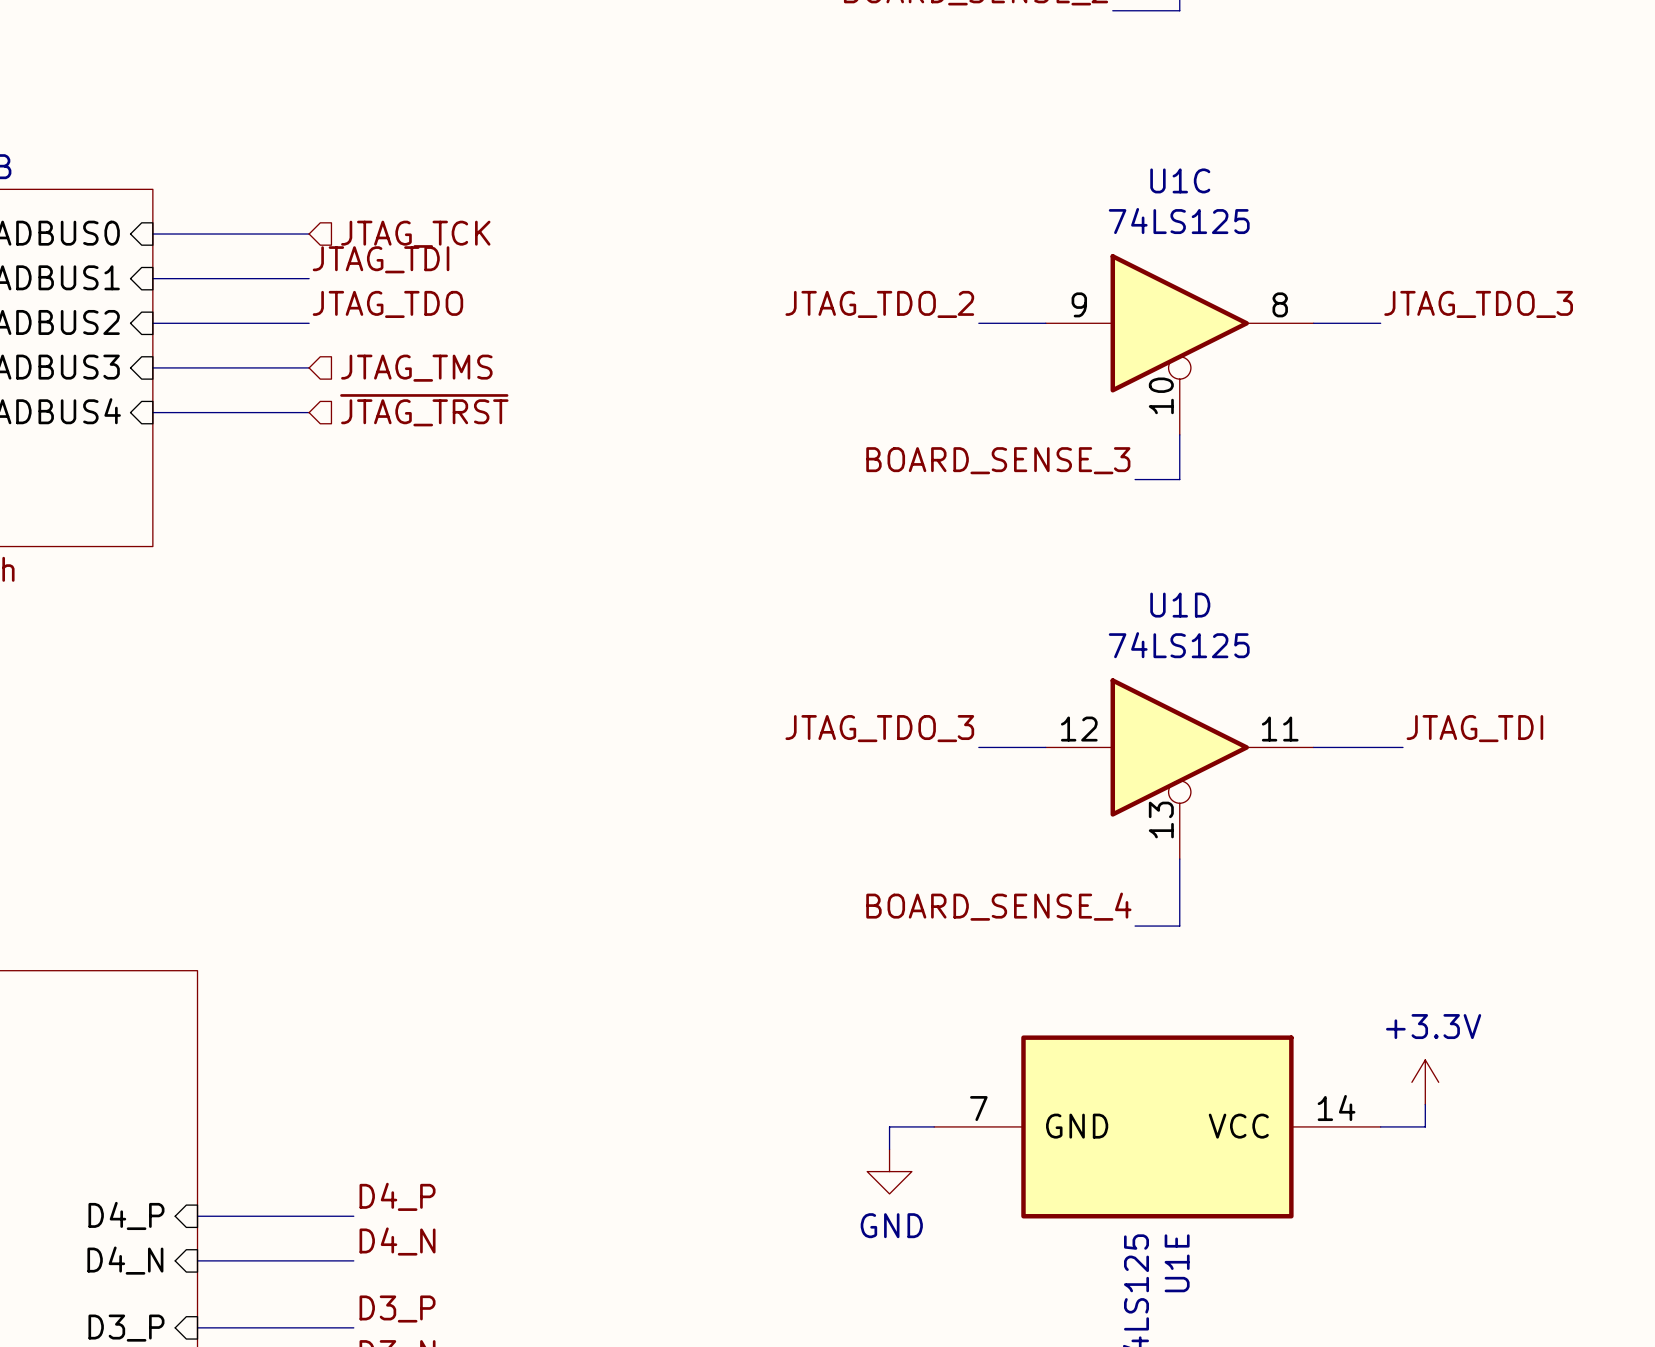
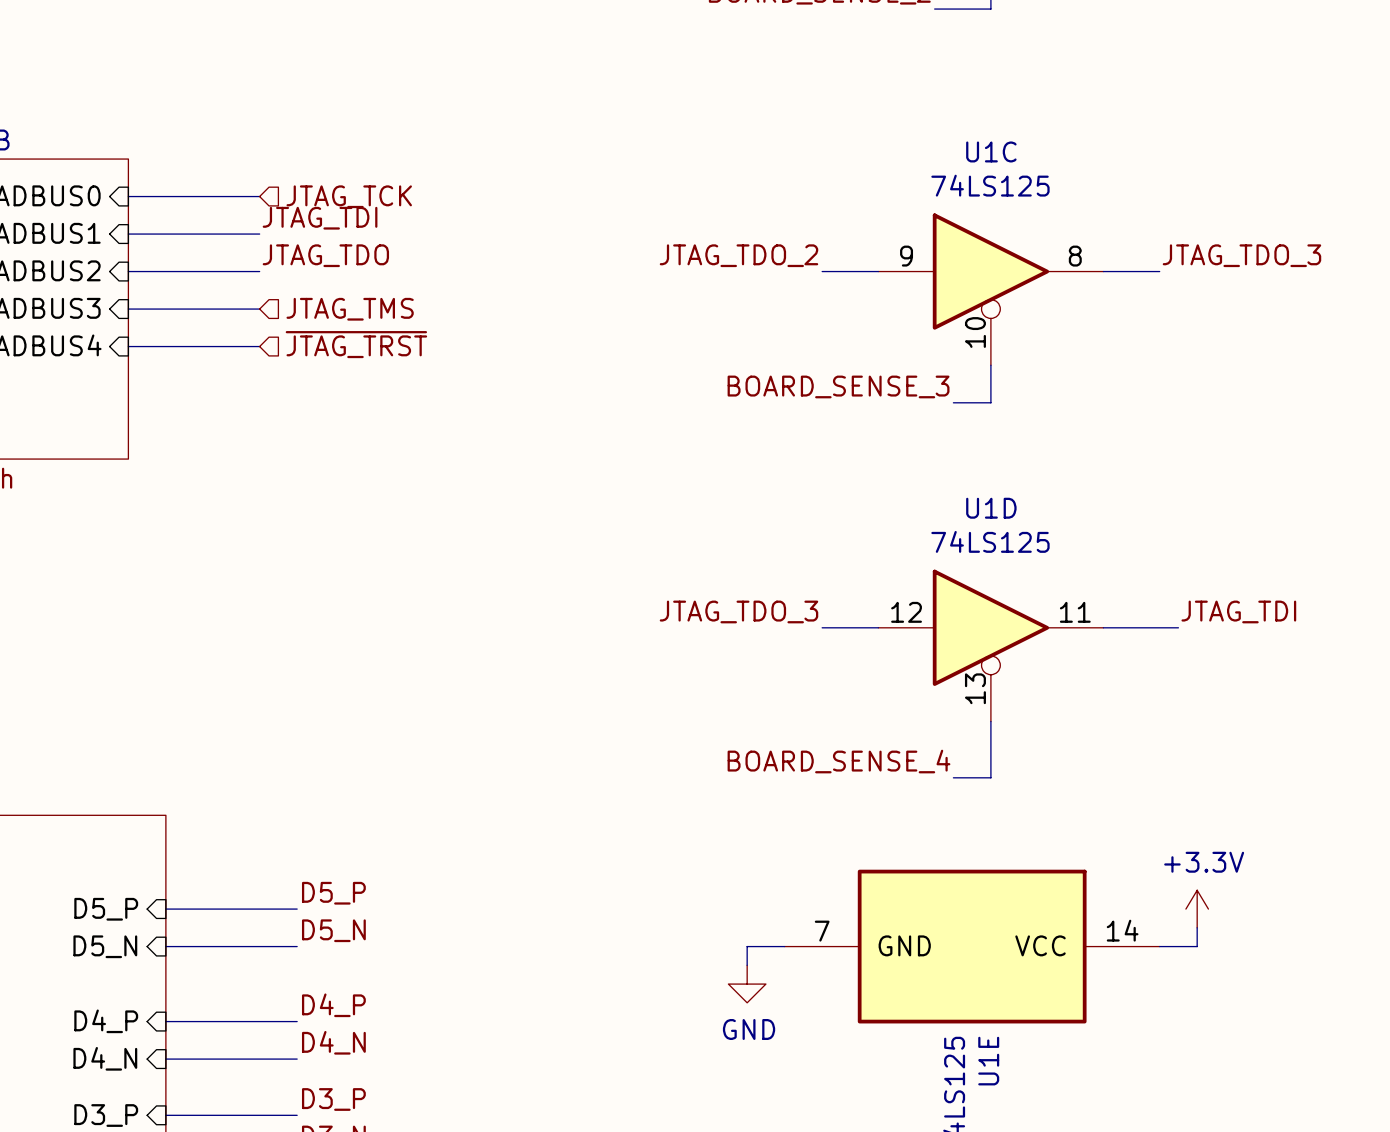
label: none -> D5_P (333, 893)
sheet pin: none -> D5_P (106, 909)
wire: none -> (165, 909) (297, 909)
label: none -> D5_N (333, 930)
wire: none -> (165, 946) (297, 946)
sheet pin: none -> D5_N (105, 946)

